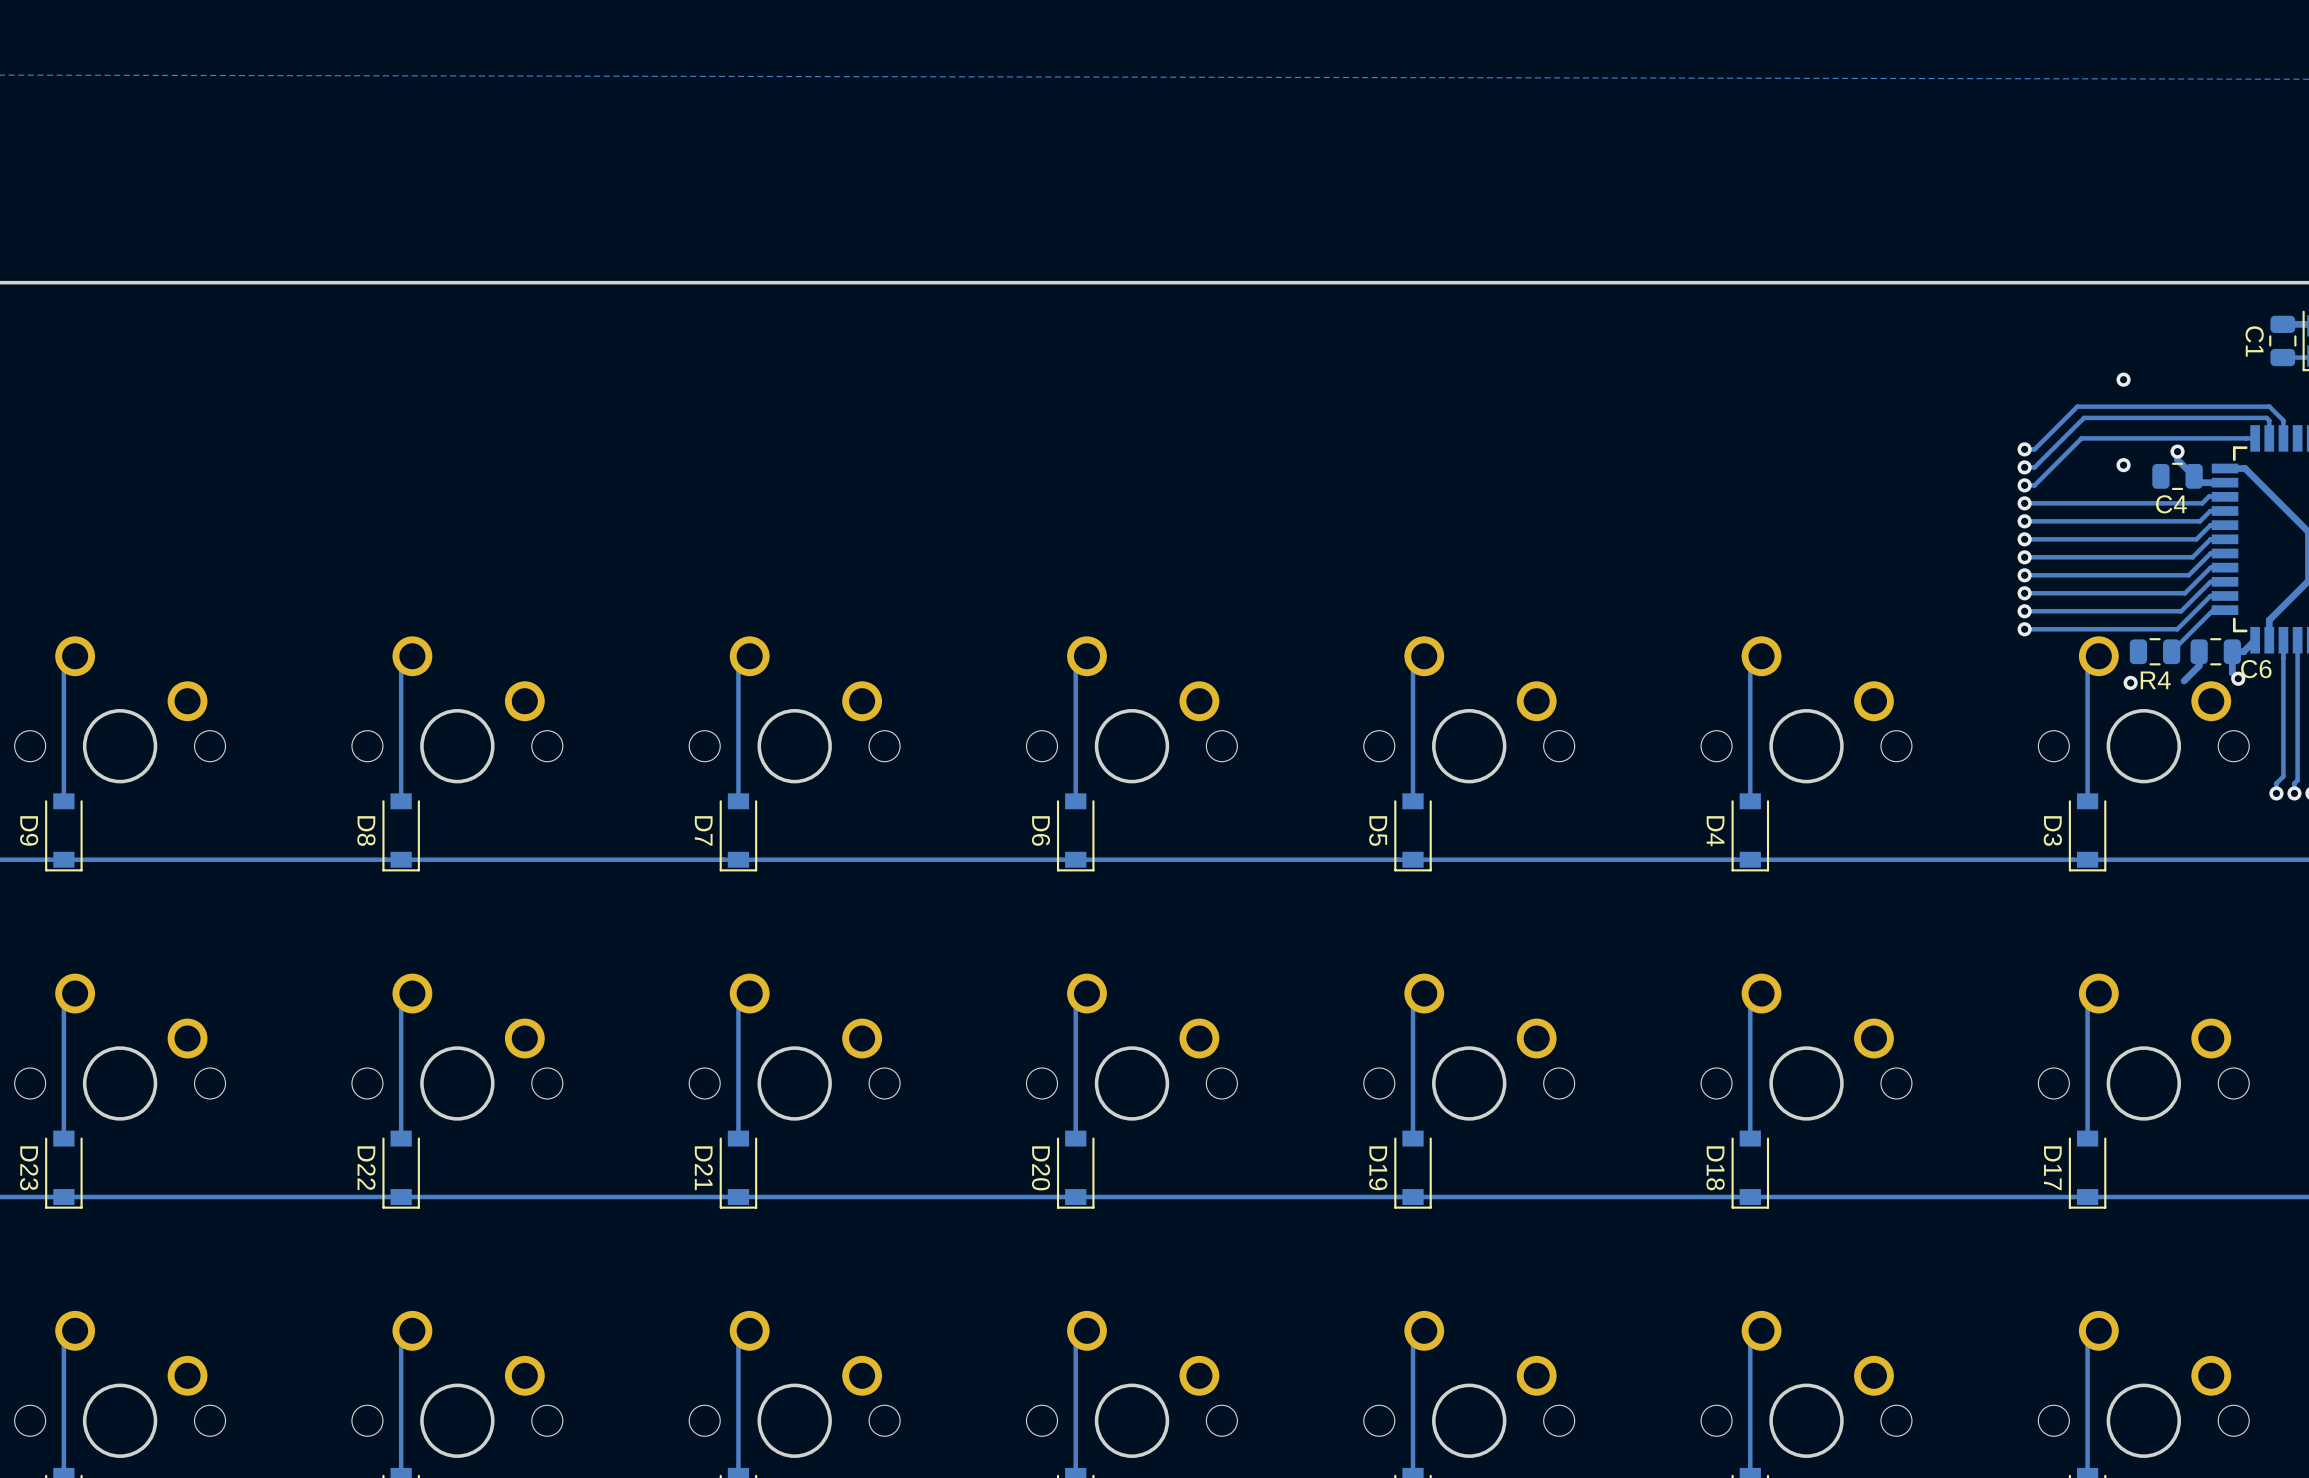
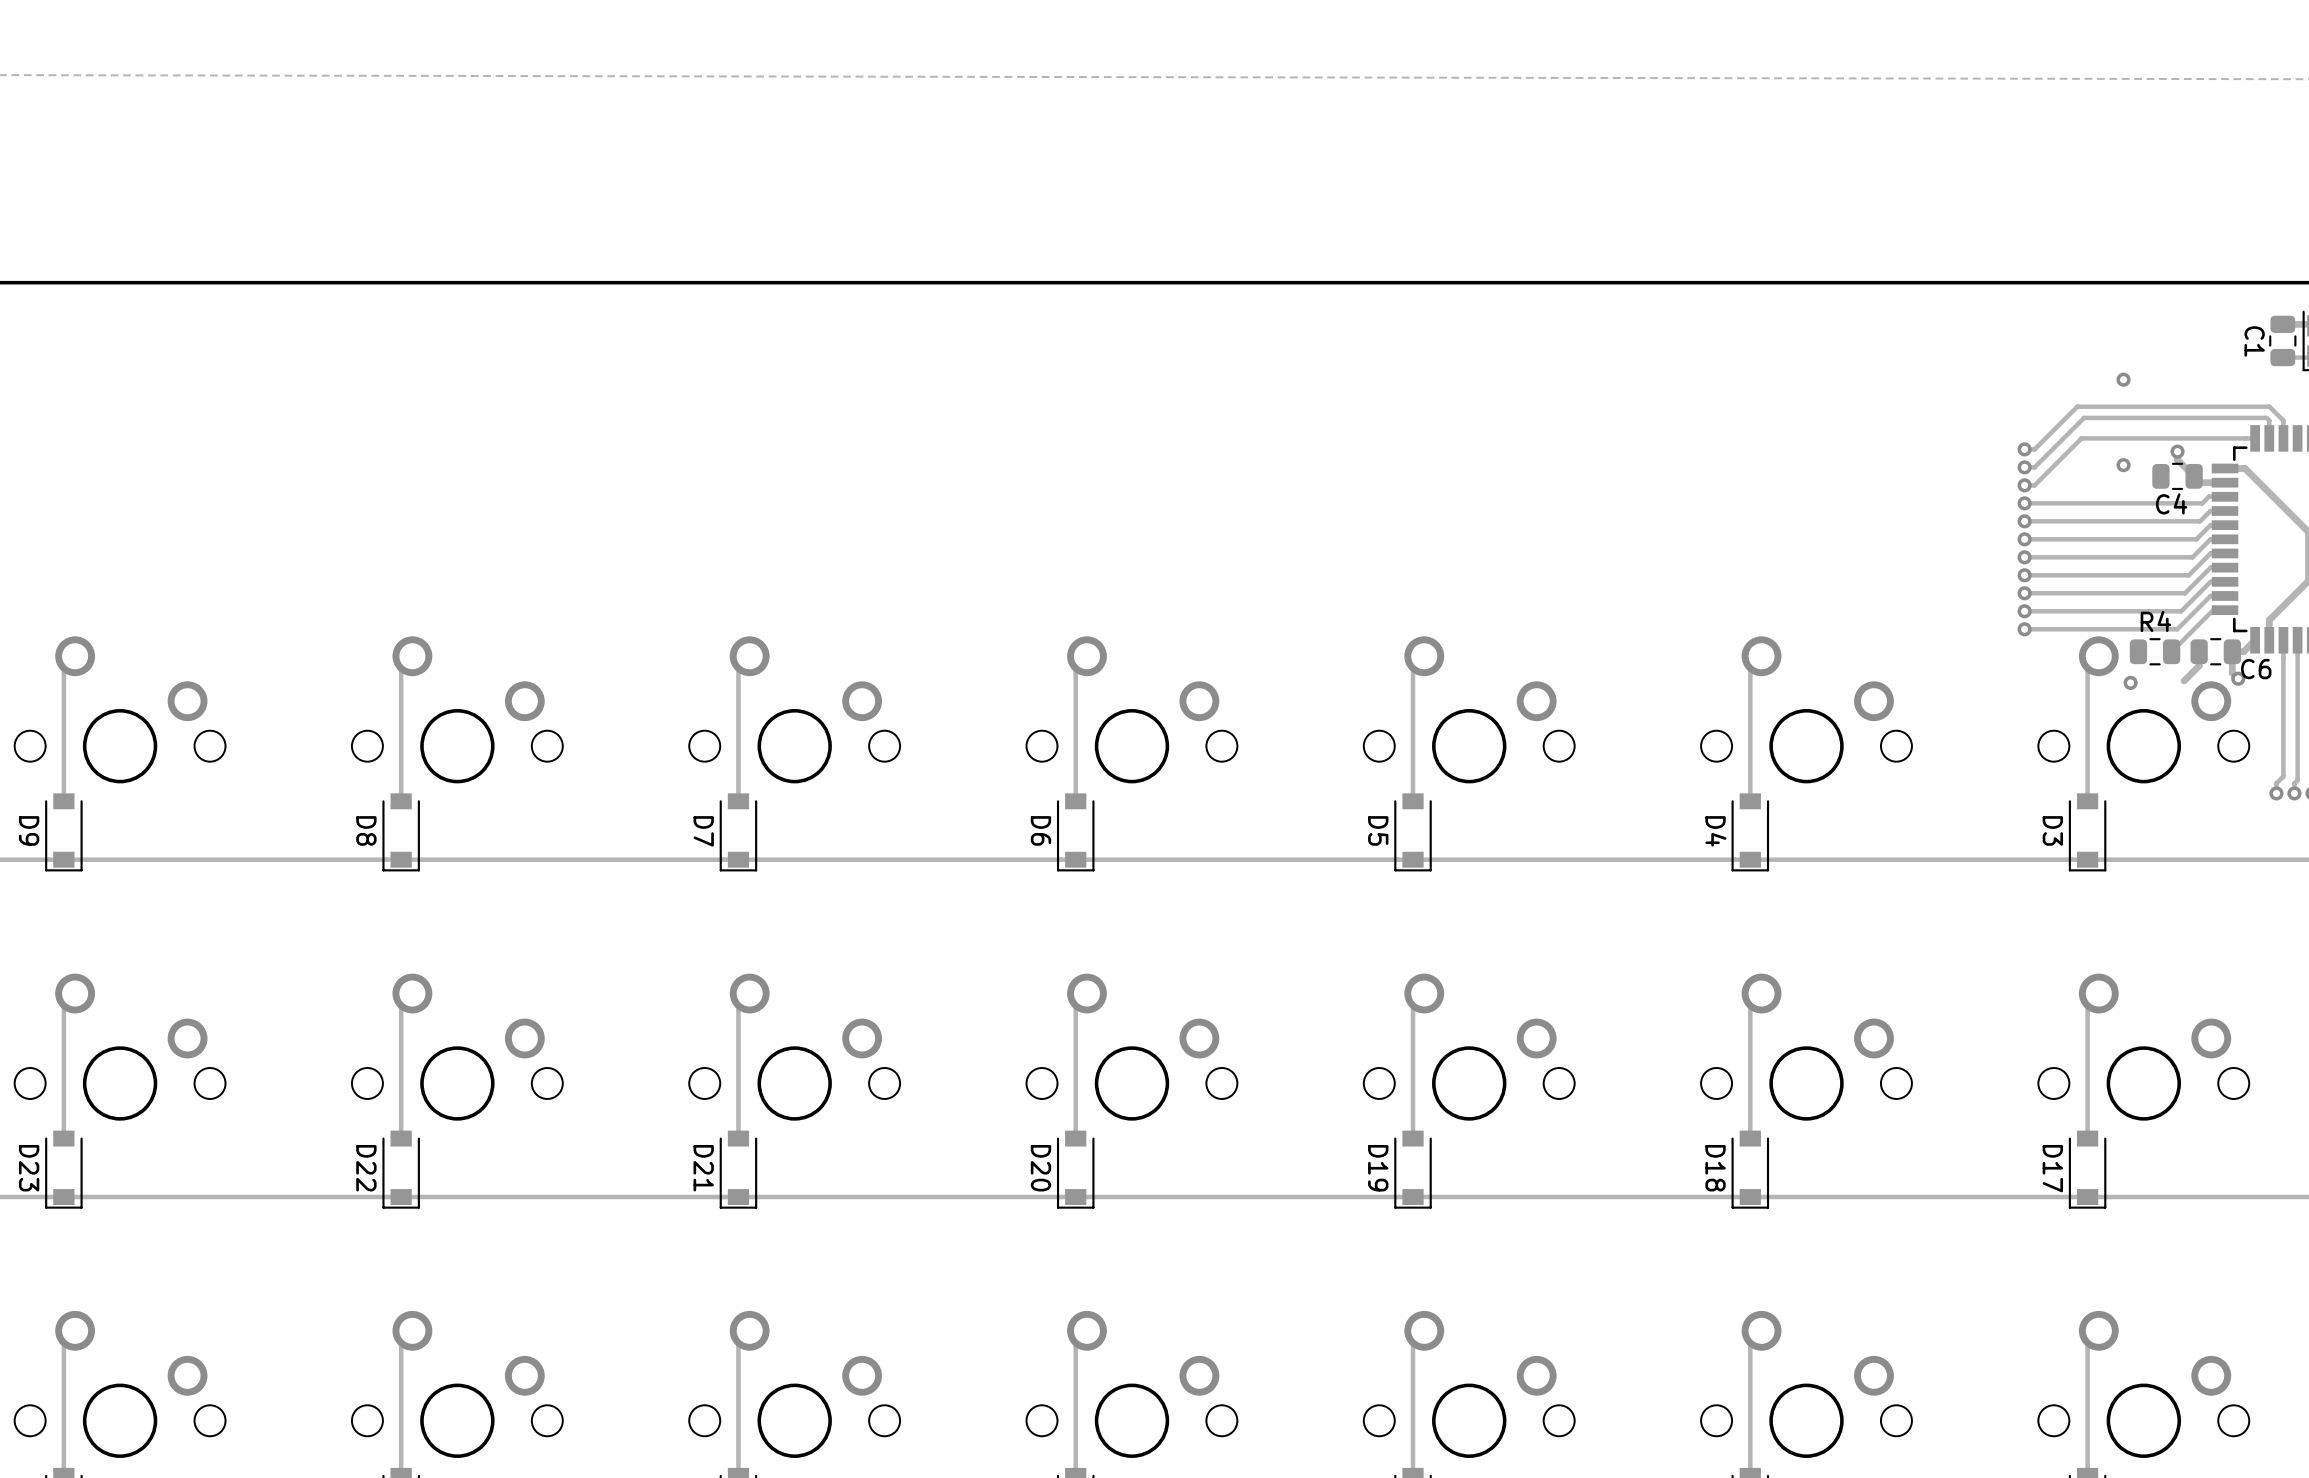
R4 name position: R4 (2155, 680) -> R4 (2155, 621)

